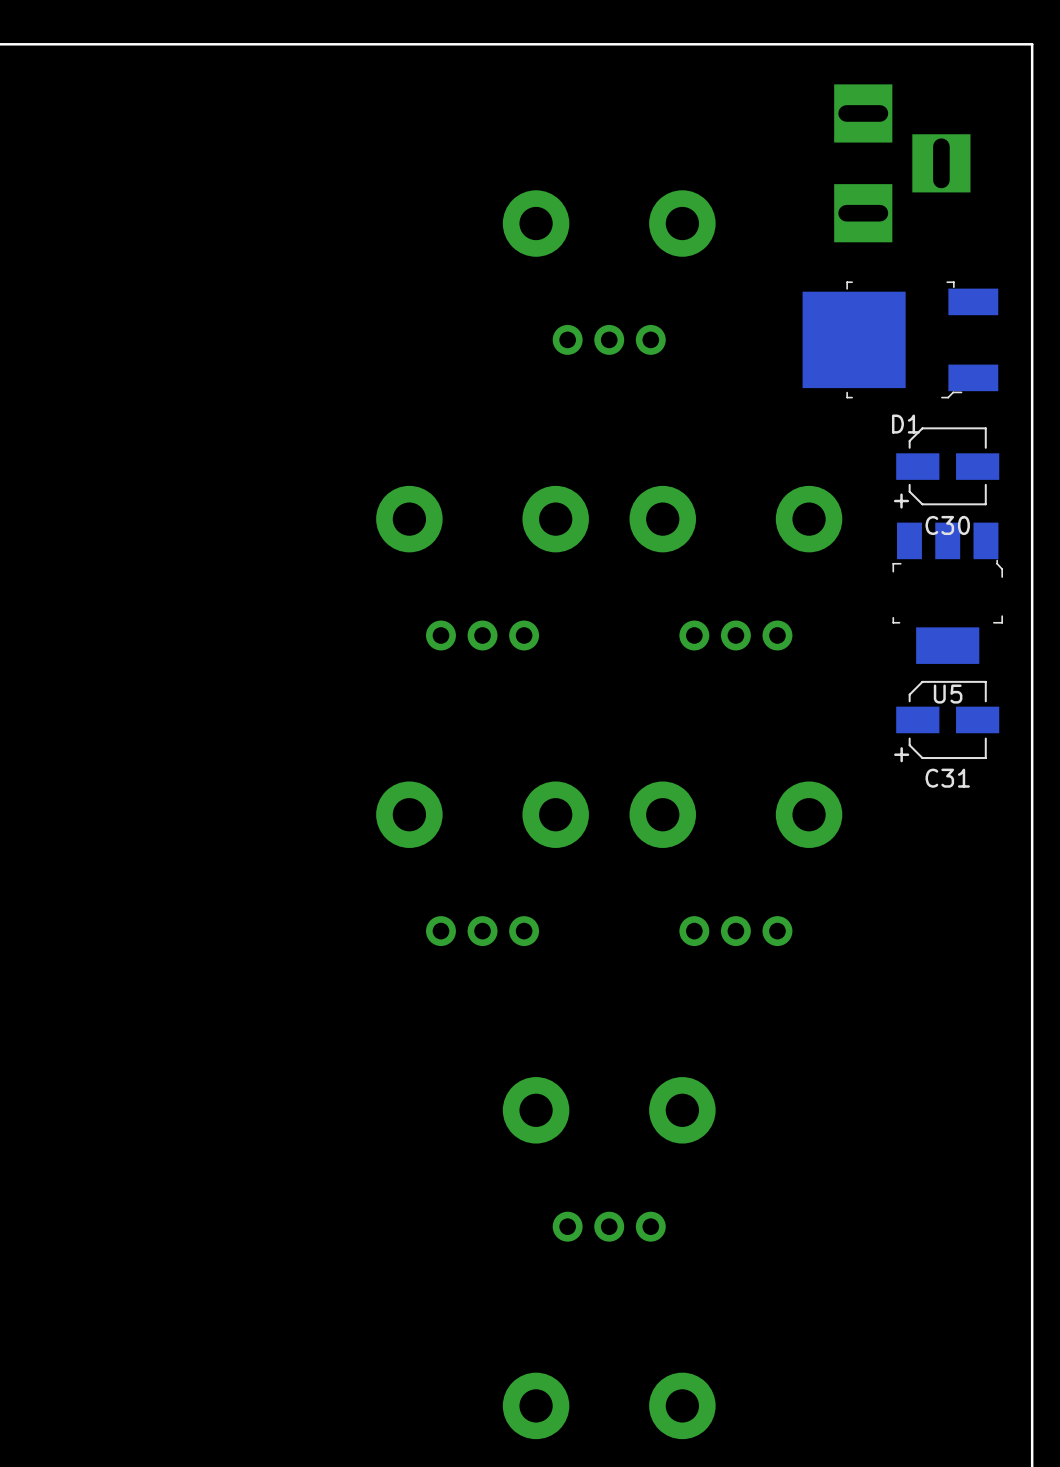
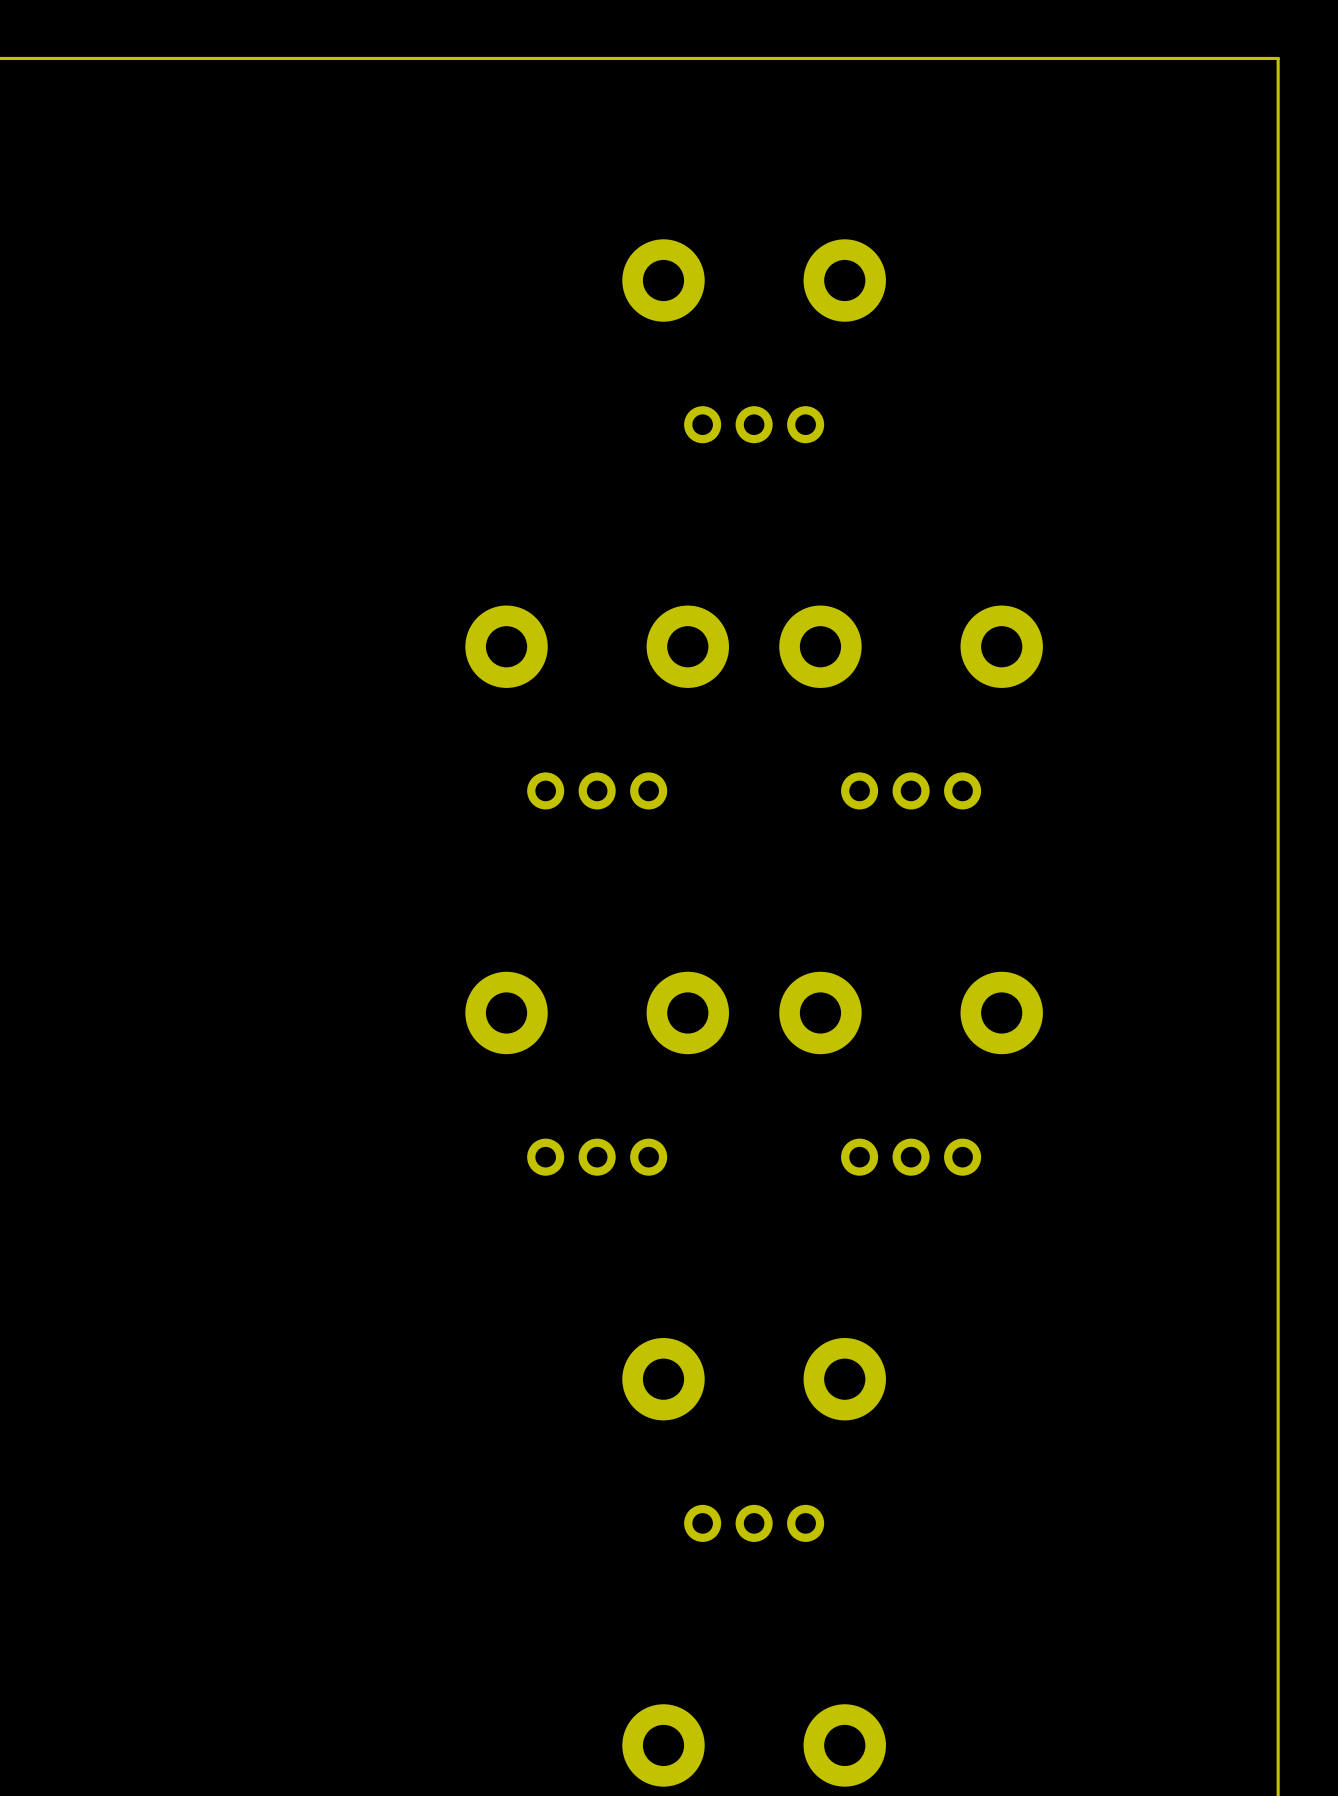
part: (902, 163) -> none
D1: (900, 339) -> none
C30: (947, 466) -> none
U5: (947, 593) -> none
C31: (947, 719) -> none

